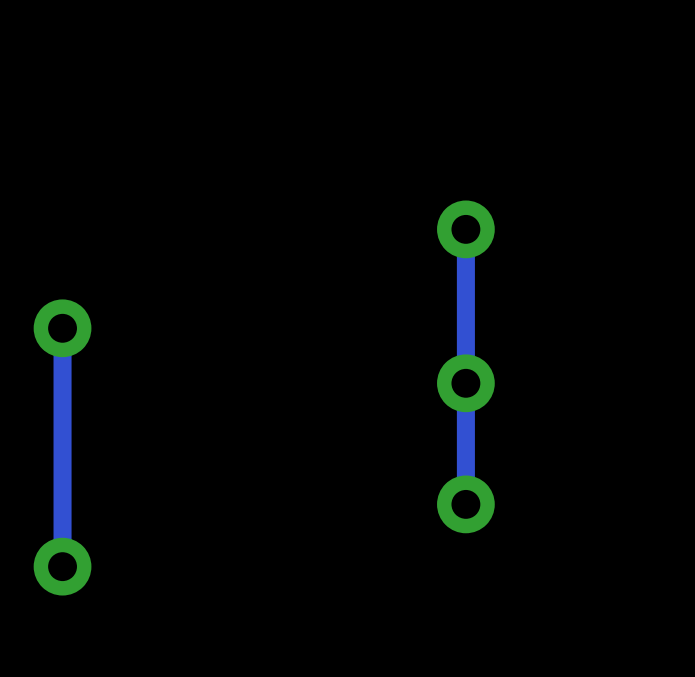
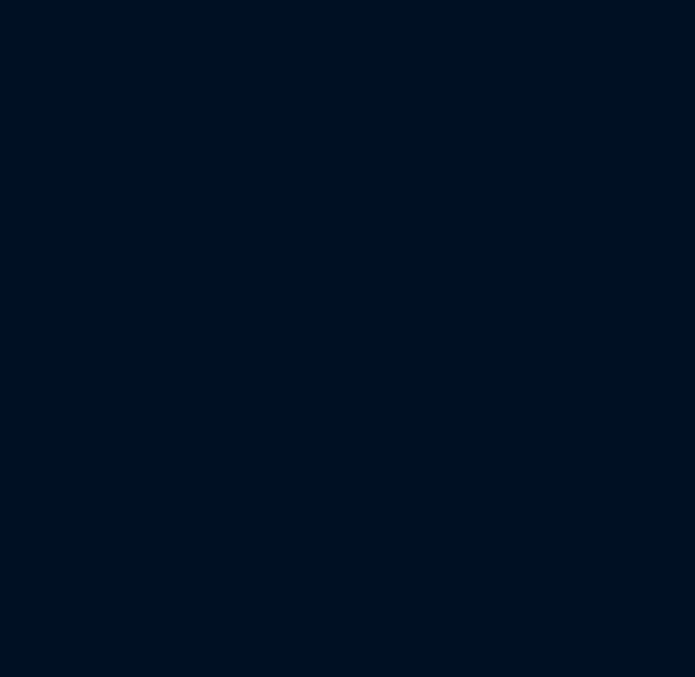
track: (465, 229) (465, 504) -> none
via: (465, 229) -> none
track: (62, 328) (62, 566) -> none
via: (62, 328) -> none
via: (465, 383) -> none
via: (465, 504) -> none
via: (62, 566) -> none

